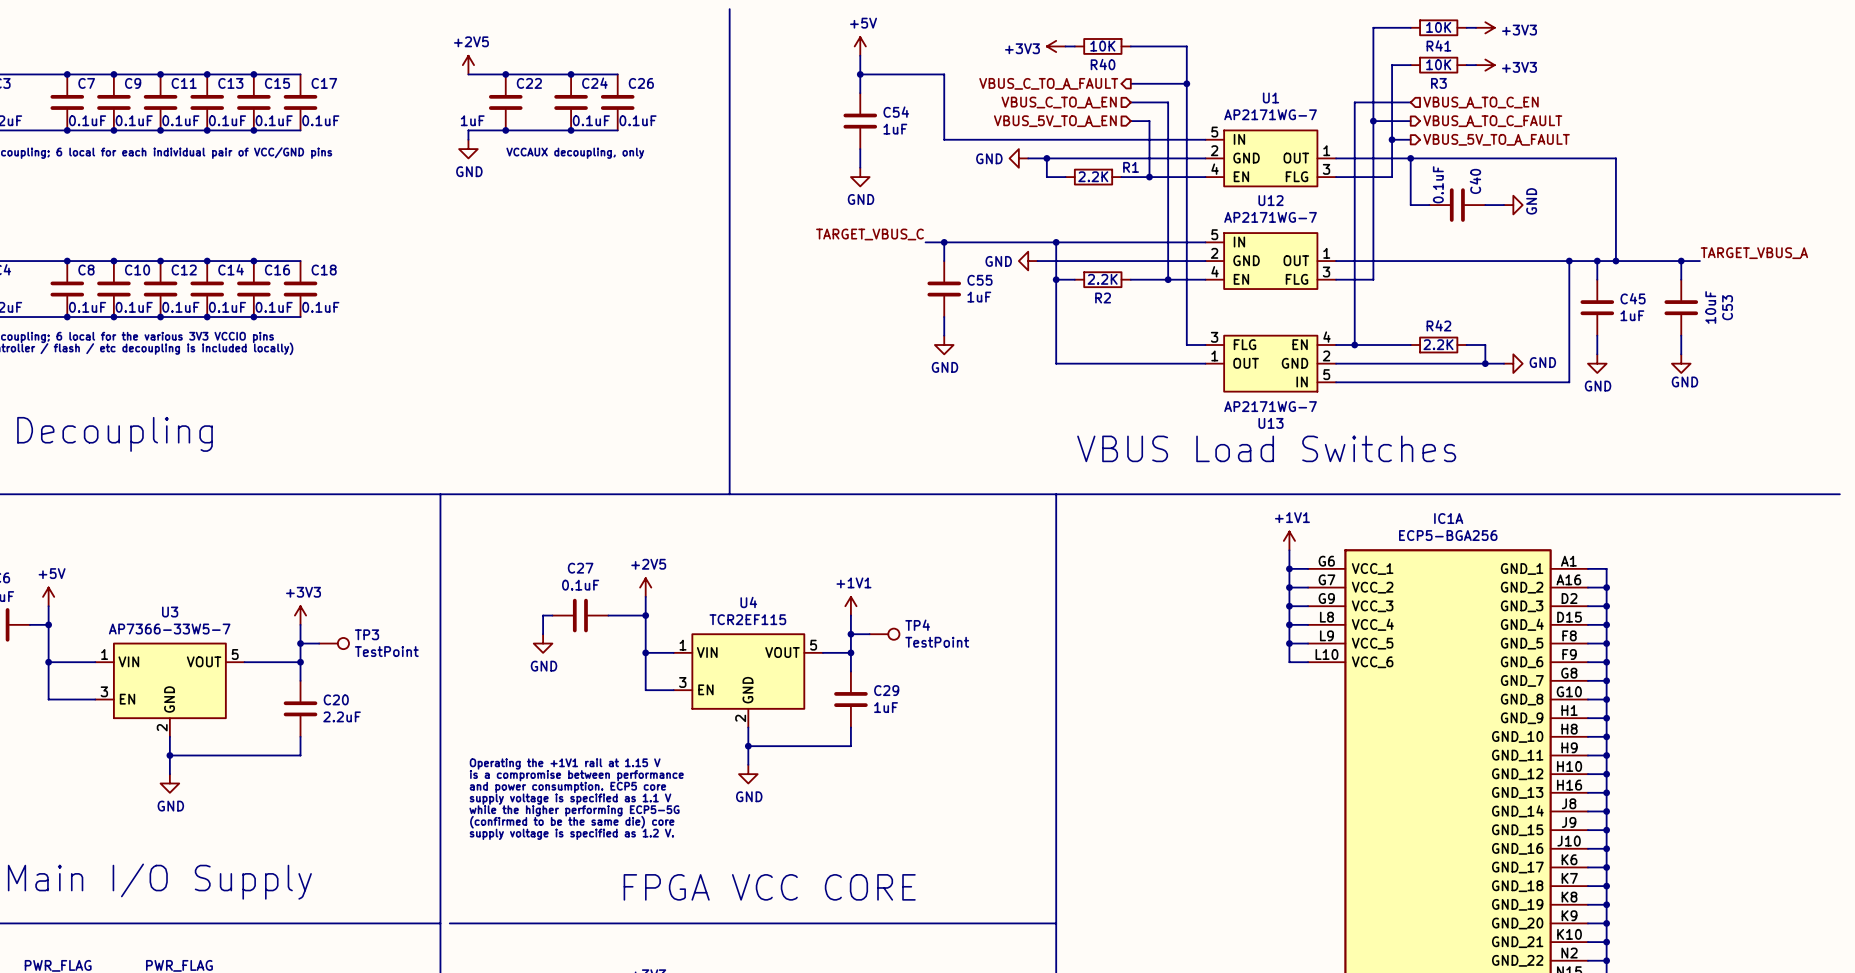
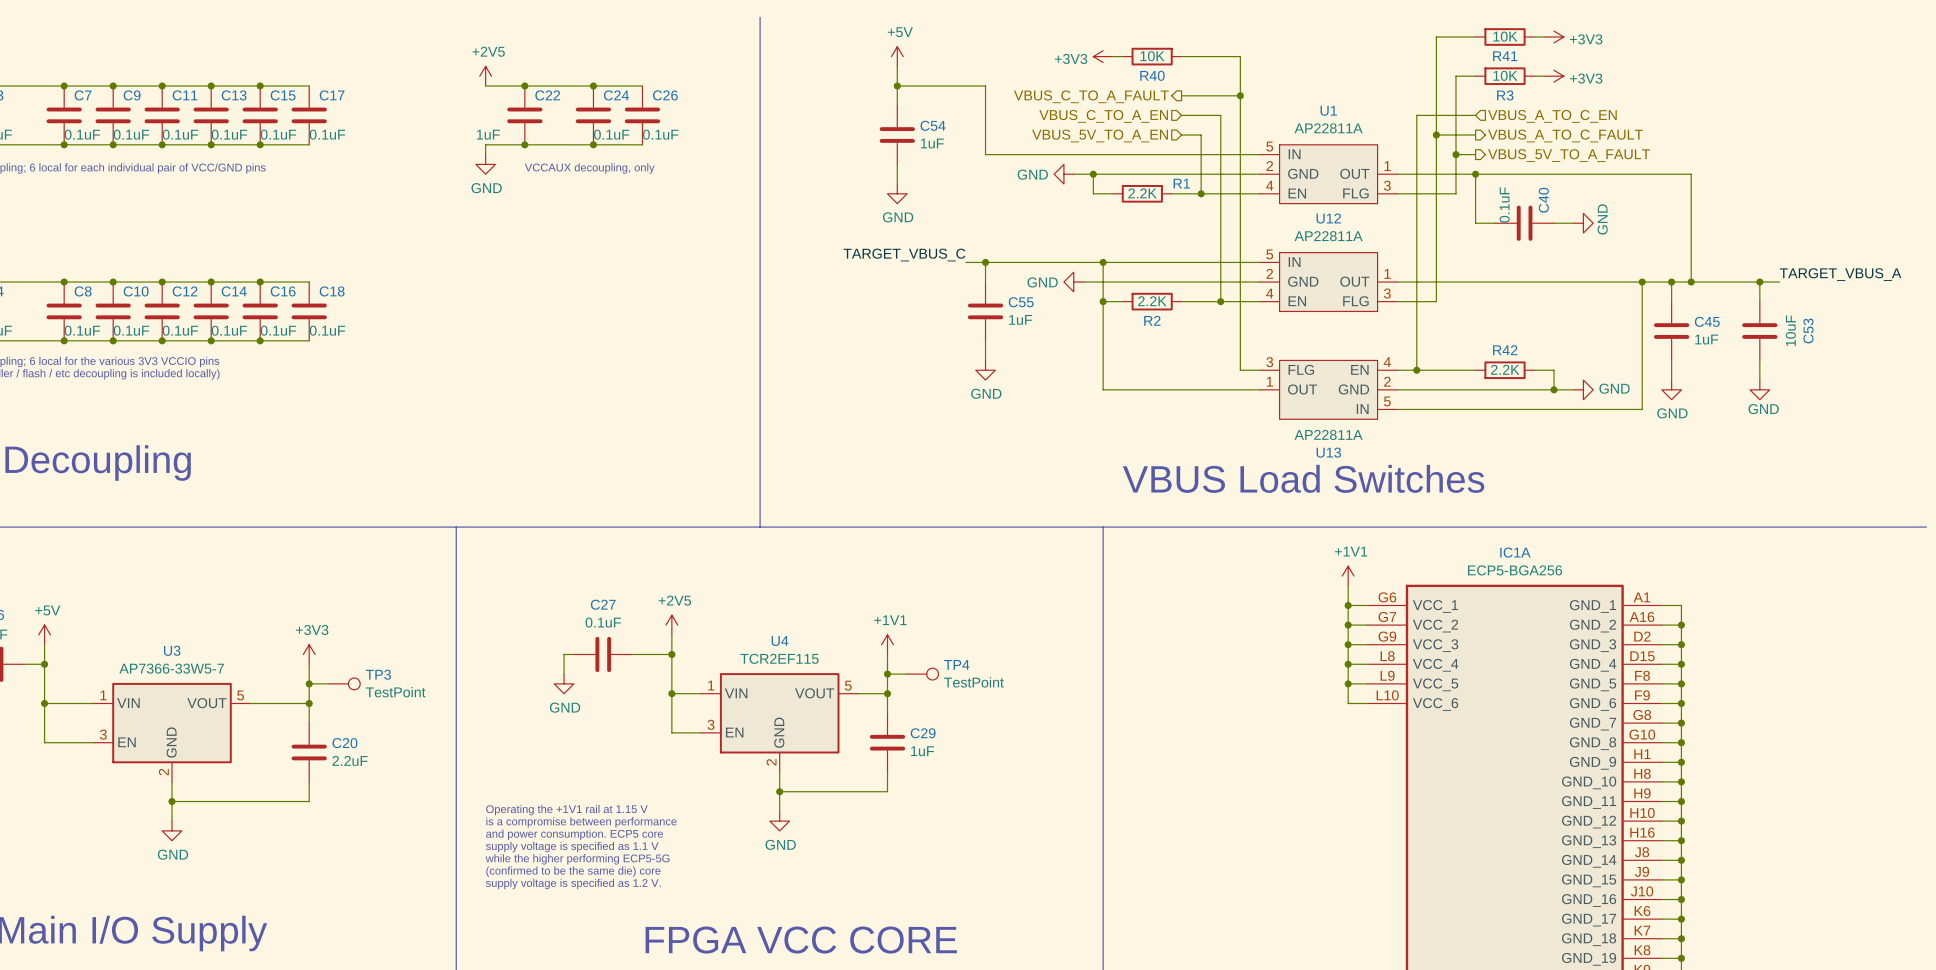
U1 value: AP2171WG-7 (1270, 114) -> AP22811A (1328, 128)
U12 value: AP2171WG-7 (1270, 217) -> AP22811A (1328, 236)
U13 value: AP2171WG-7 (1270, 406) -> AP22811A (1328, 434)

